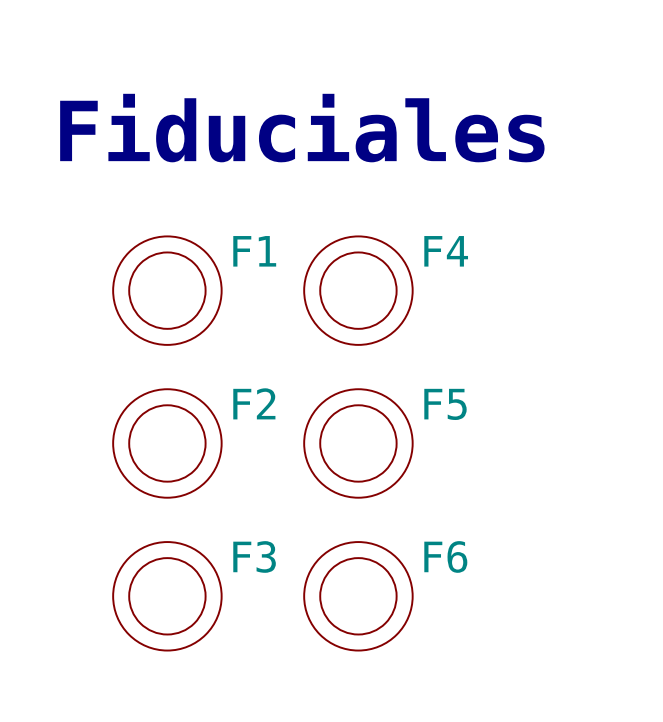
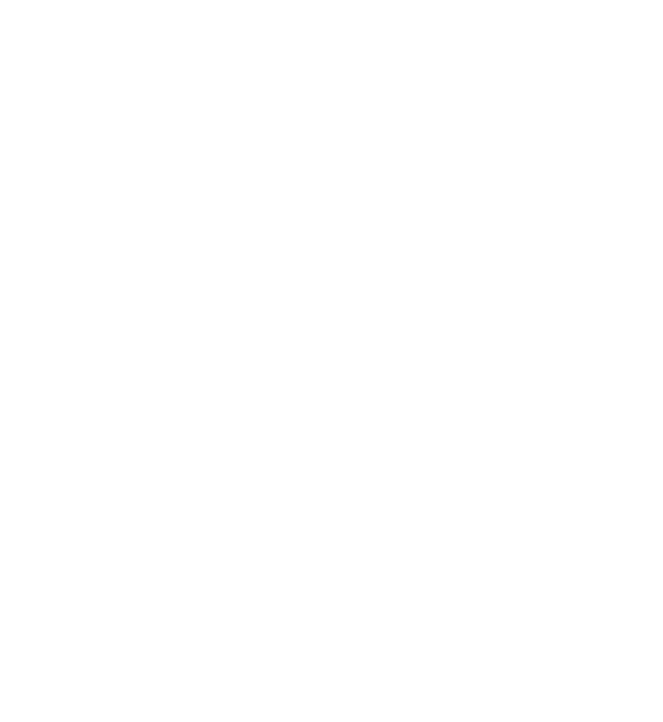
text: Fiduciales (302, 128) -> none
F1: (167, 290) -> none
F4: (358, 290) -> none
F2: (167, 443) -> none
F5: (358, 443) -> none
F3: (167, 596) -> none
F6: (358, 596) -> none

